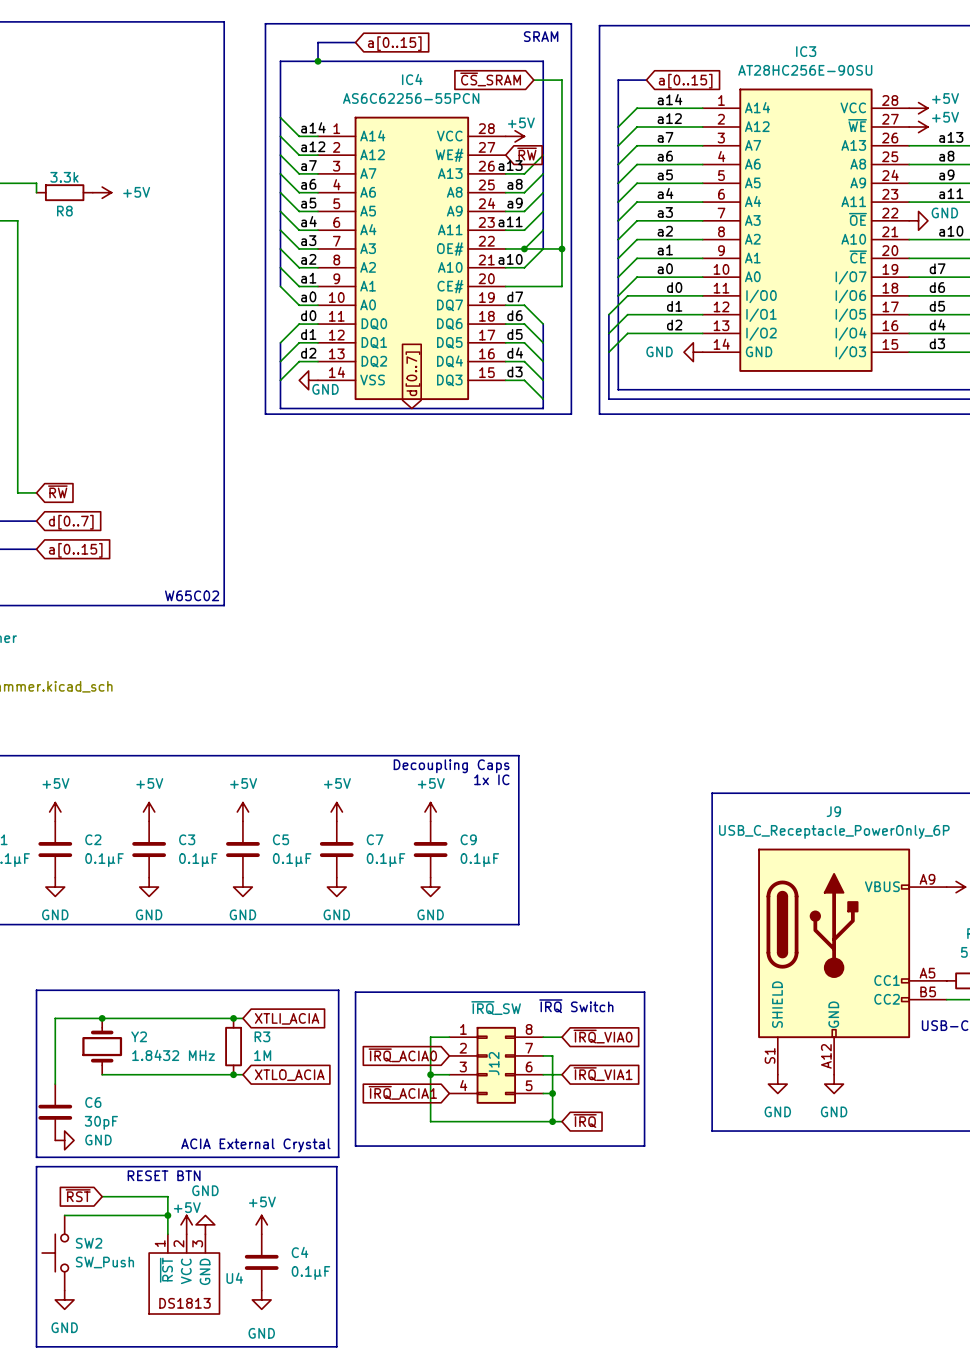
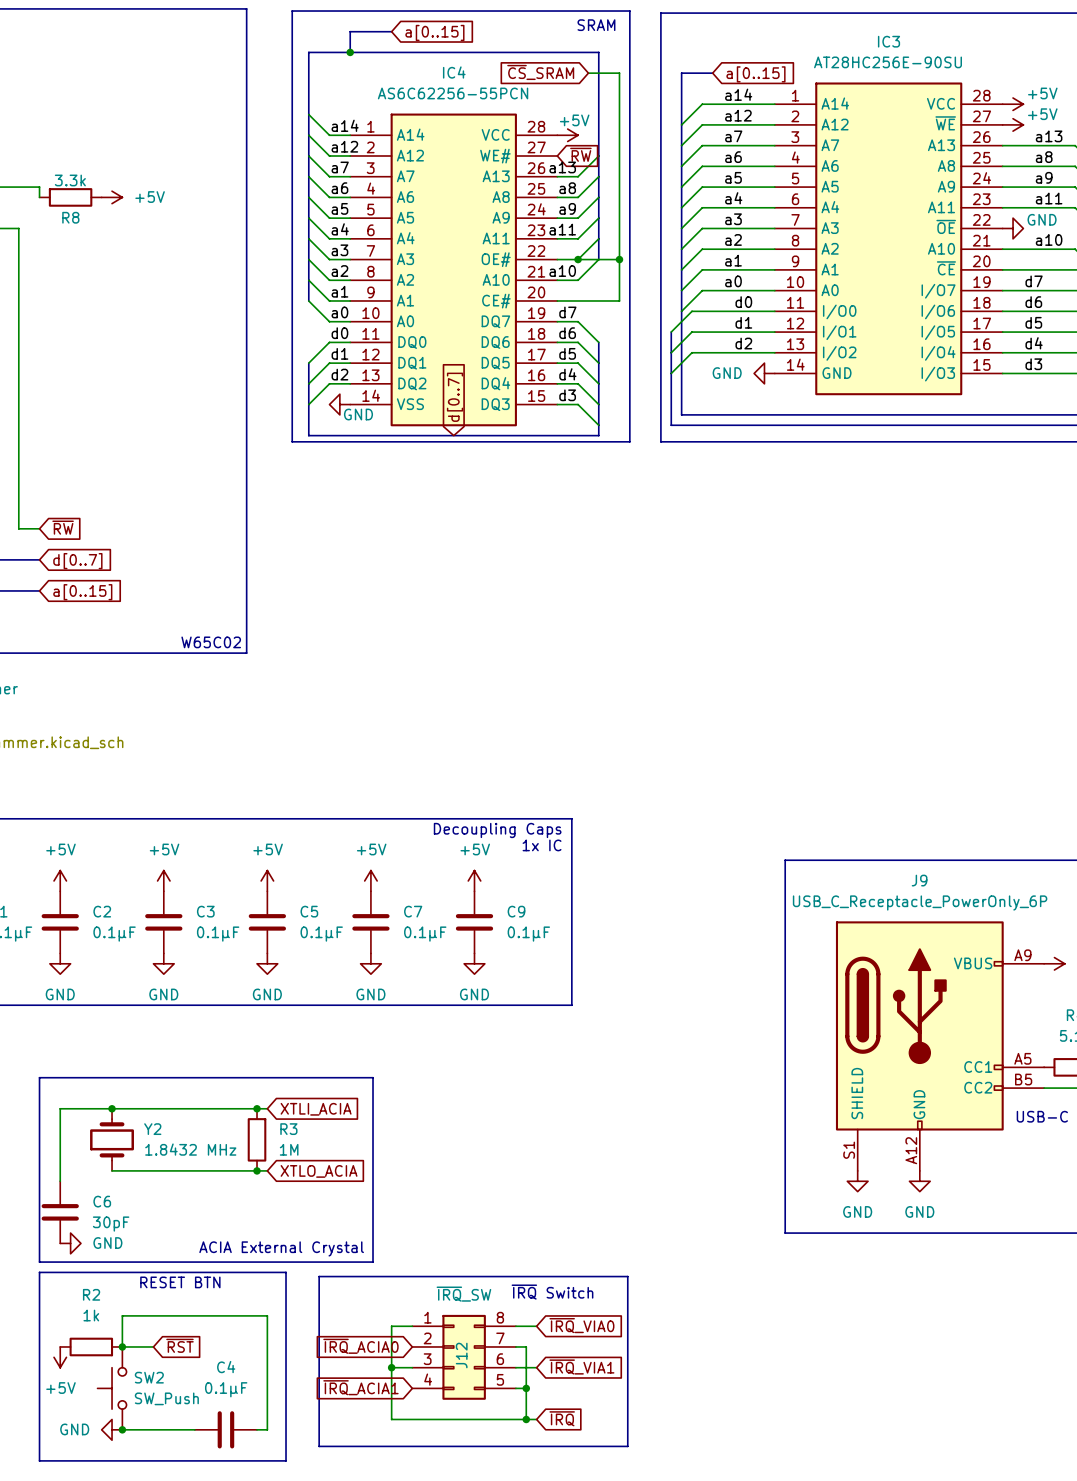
line: (355, 992) (644, 992) (644, 1146) (355, 1146) (355, 992) -> none
text: ~{IRQ} Switch (576, 1006) -> none
global label: ~{IRQ}_VIA0 (603, 1036) -> none
wire: (449, 1037) (430, 1037) (430, 1121) (561, 1121) -> none
wire: (543, 1037) (561, 1037) -> none
global label: ~{IRQ}_ACIA0 (402, 1055) -> none
wire: (543, 1055) (552, 1055) (552, 1121) -> none
J12 position: (496, 1065) -> (464, 1357)
wire: (430, 1074) (449, 1074) -> (515, 1326) (536, 1326)
junction: (430, 1074) -> none
wire: (543, 1074) (561, 1074) -> none
global label: ~{IRQ}_VIA1 (603, 1074) -> none
global label: ~{IRQ}_ACIA1 (402, 1092) -> none
wire: (543, 1093) (552, 1093) -> none
junction: (552, 1093) -> none
junction: (552, 1121) -> none
global label: ~{IRQ} (585, 1121) -> none
line: (259, 1166) (336, 1166) (336, 1346) (36, 1346) (36, 1337) -> (286, 1272) (286, 1460) (39, 1460)
line: none -> (319, 1276) (627, 1276) (627, 1446) (319, 1446) (319, 1276)
text: none -> ~{IRQ} Switch (552, 1292)
global label rotation: 0° (78, 1195) -> 180° (179, 1345)
global label position: ~{RST} (78, 1195) -> ~{RST} (179, 1345)
wire: (102, 1196) (167, 1196) (167, 1234) -> none
global label: none -> ~{IRQ}_VIA0 (581, 1325)
wire: (64, 1215) (167, 1215) -> none
junction: (167, 1215) -> none
wire: none -> (412, 1326) (391, 1326) (391, 1419) (536, 1419)
power symbol: +5V (186, 1224) -> none
power symbol: GND (205, 1224) -> none
power symbol: +5V (261, 1224) -> none
global label: none -> ~{IRQ}_ACIA0 (360, 1346)
R2: none -> 1k (91, 1346)
junction: none -> (122, 1346)
wire: none -> (153, 1346) (122, 1346) (122, 1315) (267, 1315) (267, 1429) (257, 1429)
wire: none -> (515, 1346) (526, 1346) (526, 1419)
power symbol: none -> +5V (60, 1357)
C4 name position: C4 (299, 1252) -> C4 (226, 1367)
global label: none -> ~{IRQ}_VIA1 (581, 1367)
SW2 position: (55, 1253) -> (112, 1388)
wire: none -> (391, 1367) (412, 1367)
junction: none -> (391, 1367)
wire: none -> (515, 1367) (536, 1367)
C4 rotation: 0° (261, 1262) -> 90° clockwise (225, 1429)
C4 position: (261, 1262) -> (225, 1429)
global label: none -> ~{IRQ}_ACIA1 (360, 1387)
wire: none -> (515, 1388) (526, 1388)
junction: none -> (526, 1388)
C4 value position: 0.1µF (310, 1272) -> 0.1µF (226, 1389)
U4: (184, 1274) -> none
power symbol rotation: 0° (64, 1299) -> 90° clockwise (112, 1429)
power symbol position: GND (64, 1299) -> GND (112, 1429)
power symbol: GND (261, 1299) -> none
junction: none -> (526, 1419)
global label: none -> ~{IRQ} (562, 1418)
wire: none -> (122, 1429) (194, 1429)
junction: none -> (122, 1429)

